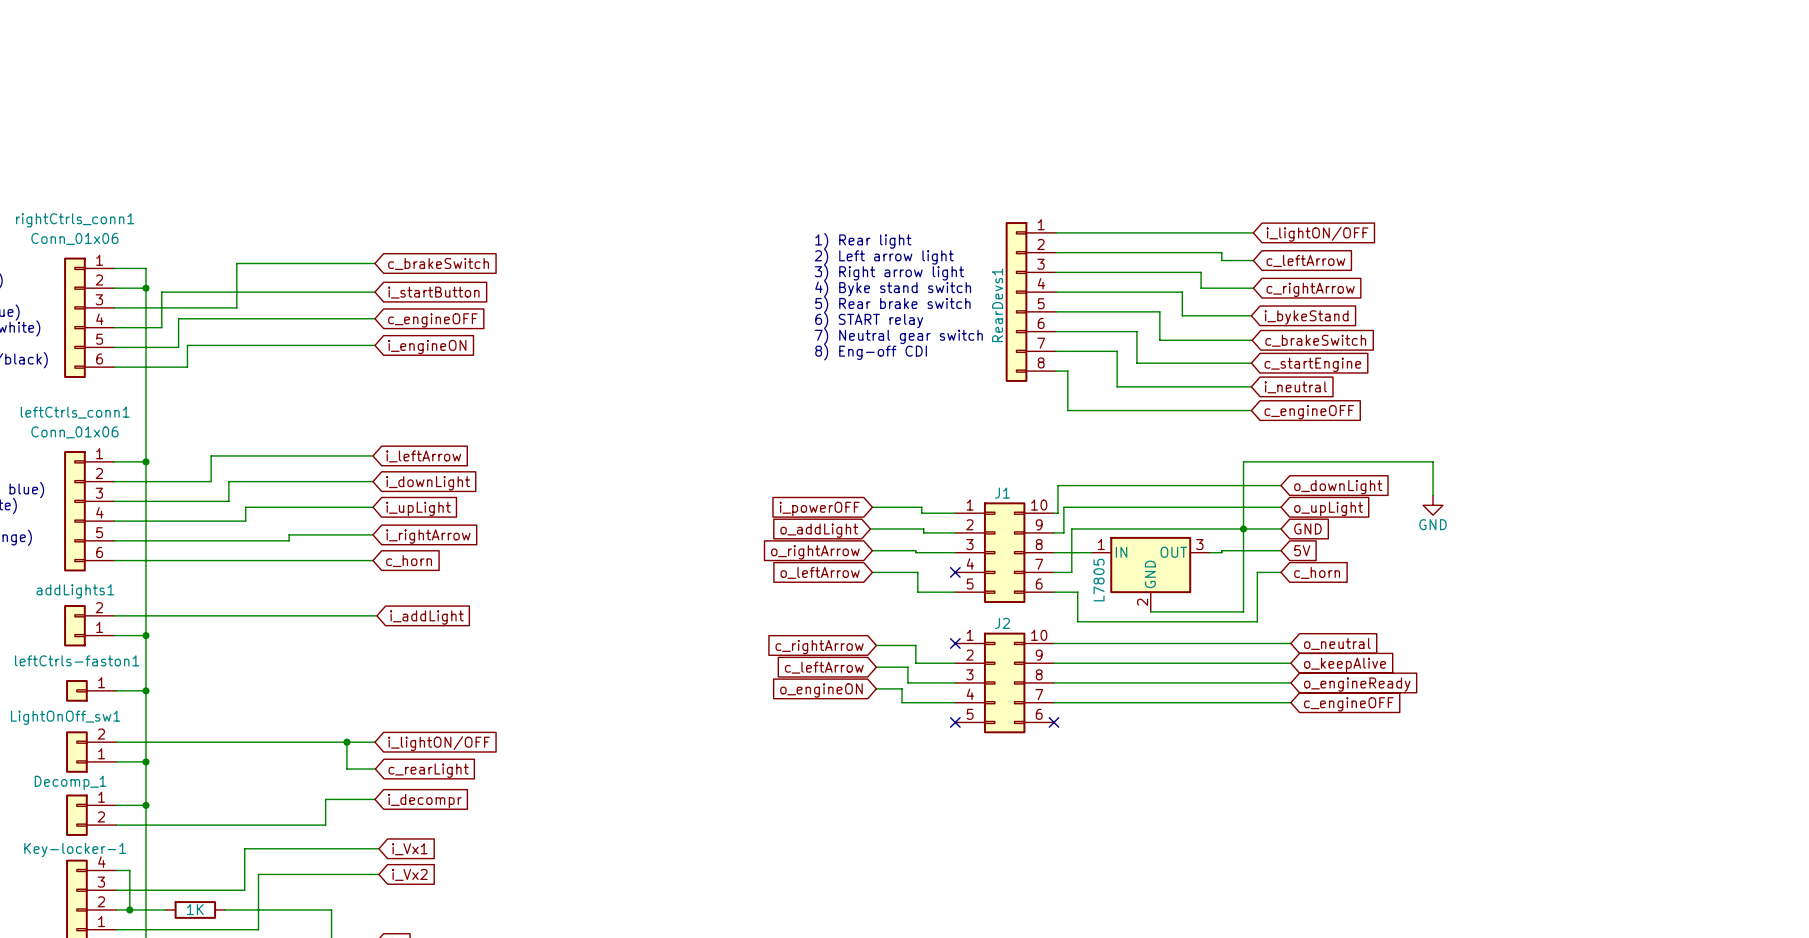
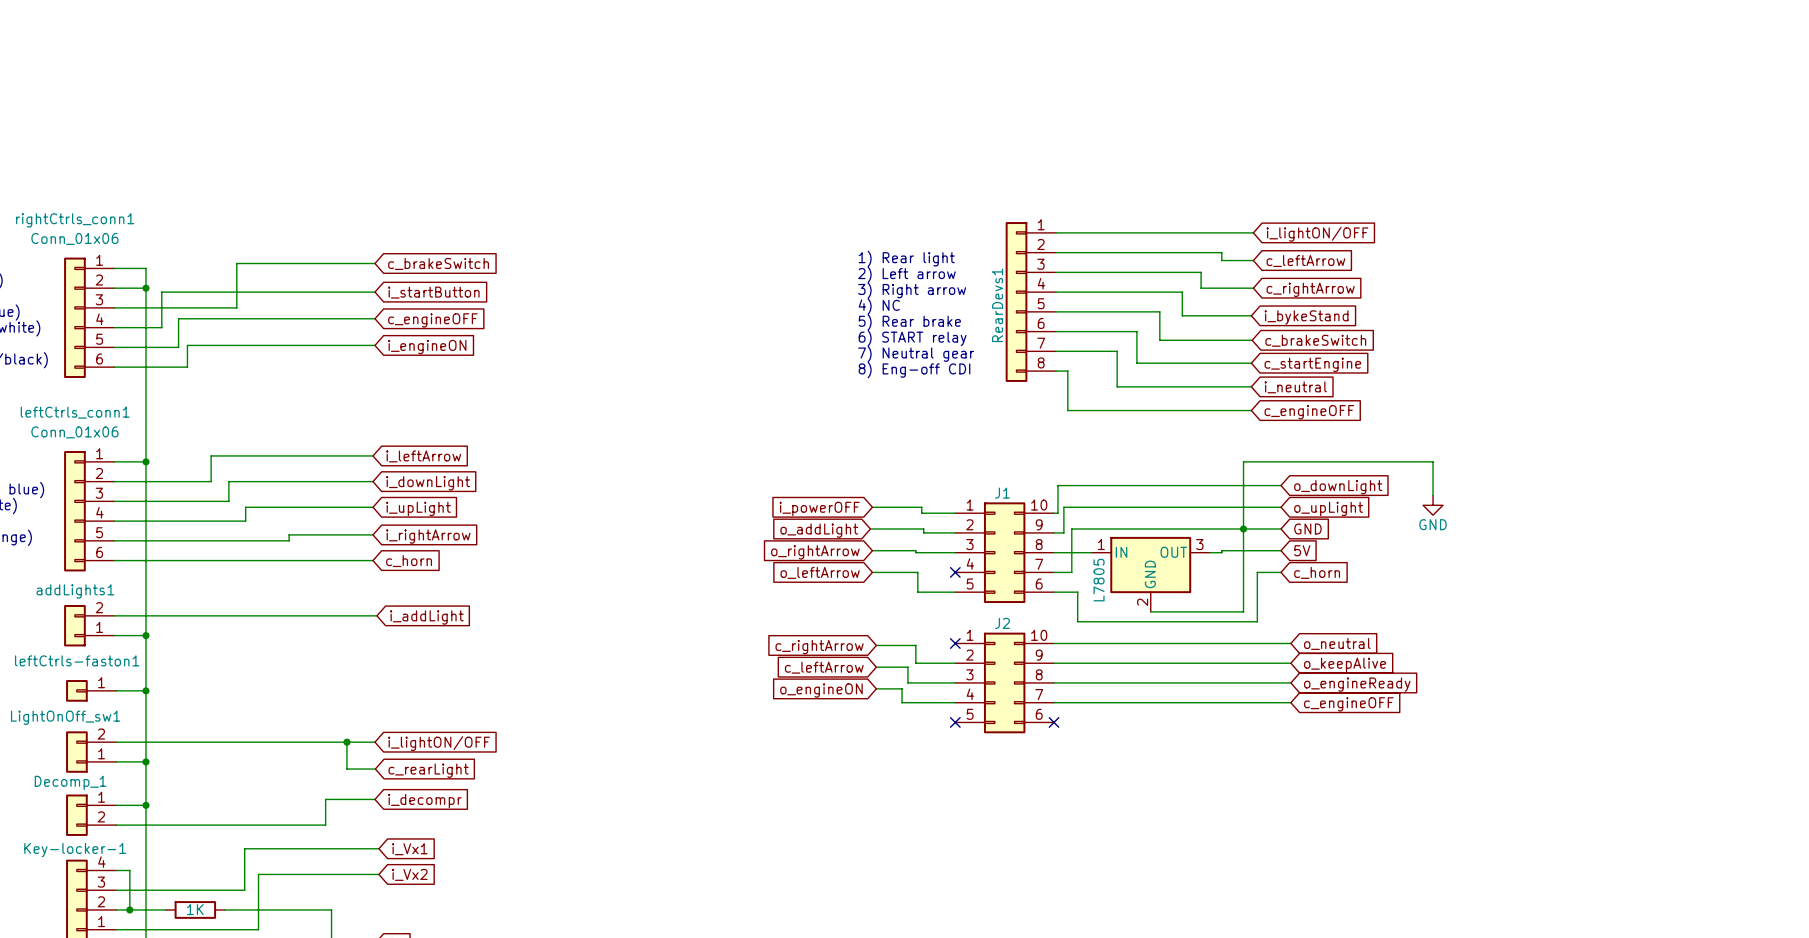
text position: 1) Rear light (863, 241) -> 1) Rear light (906, 258)
text: 2) Left arrow light (884, 256) -> 2) Left arrow (906, 274)
text: 3) Right arrow light (889, 272) -> 3) Right arrow (912, 290)
text: 4) Byke stand switch (893, 288) -> none
text: 5) Rear brake switch (892, 304) -> 5) Rear brake (909, 322)
text: none -> 4) NC (879, 306)
text position: 6) START relay (869, 320) -> 6) START relay (912, 338)
text: 7) Neutral gear switch (898, 336) -> 7) Neutral gear (916, 354)
text position: 8) Eng-off CDI (871, 352) -> 8) Eng-off CDI (914, 370)

